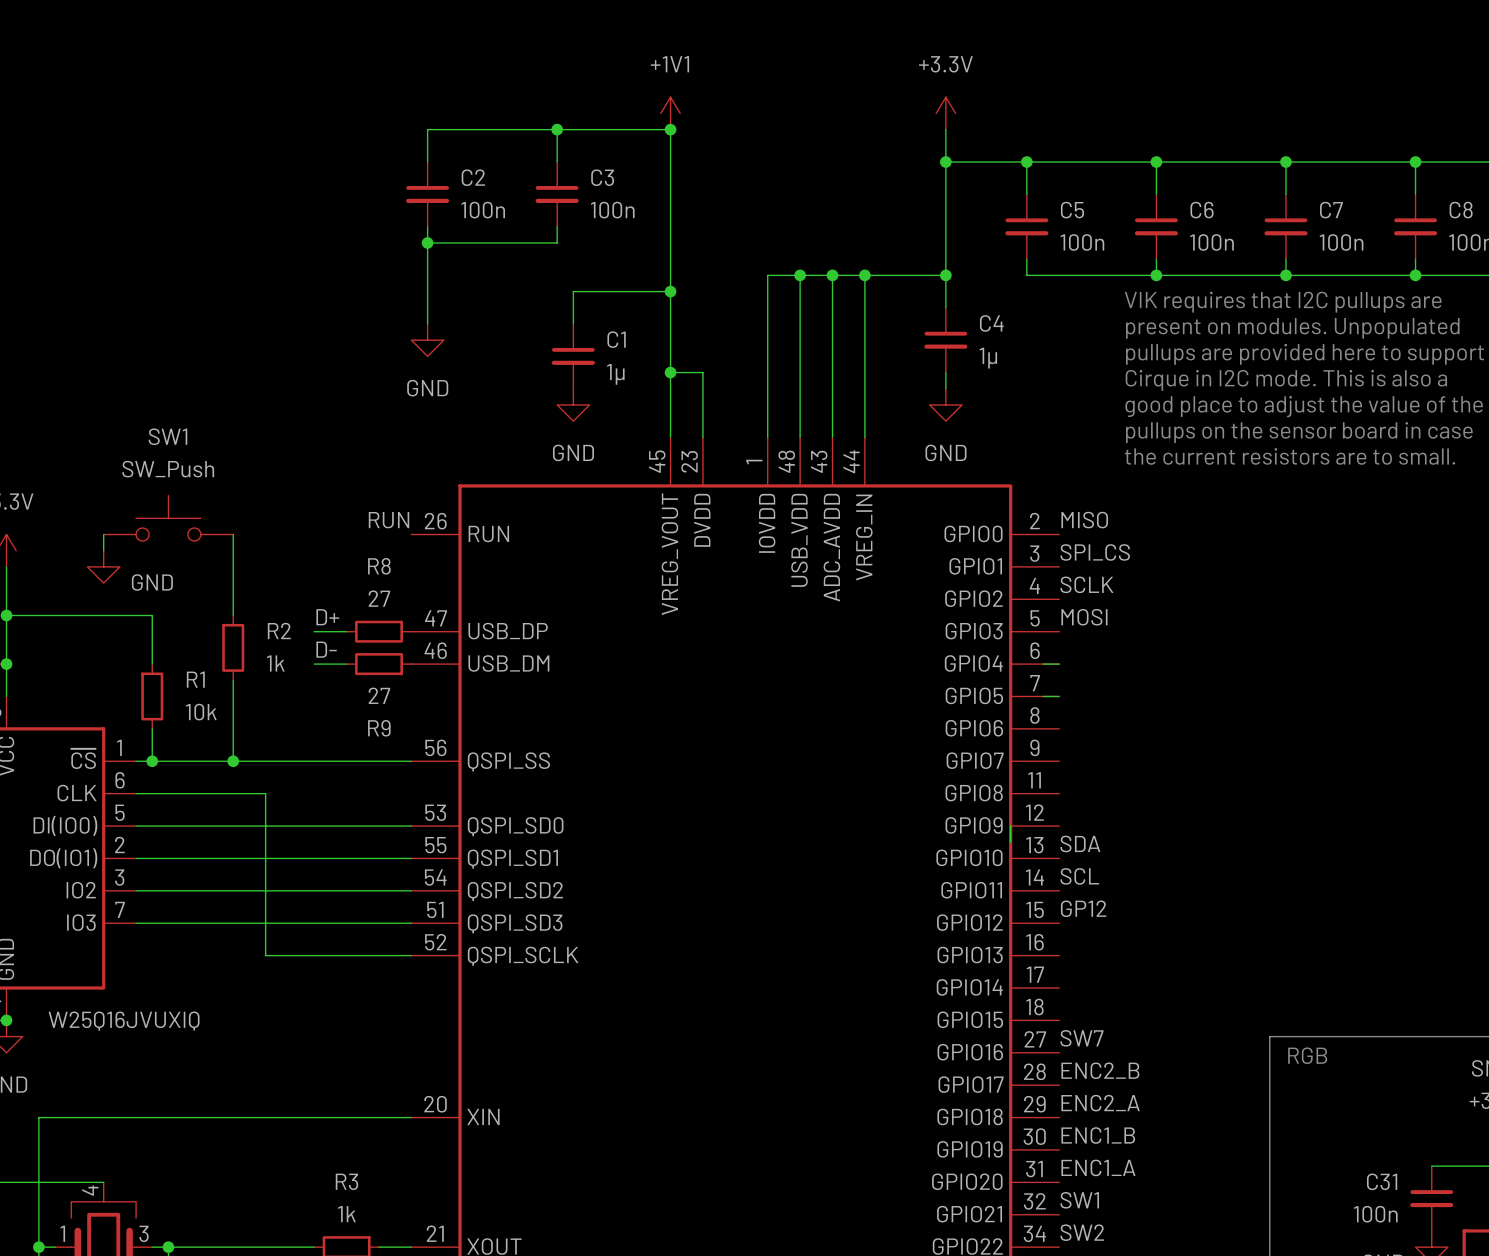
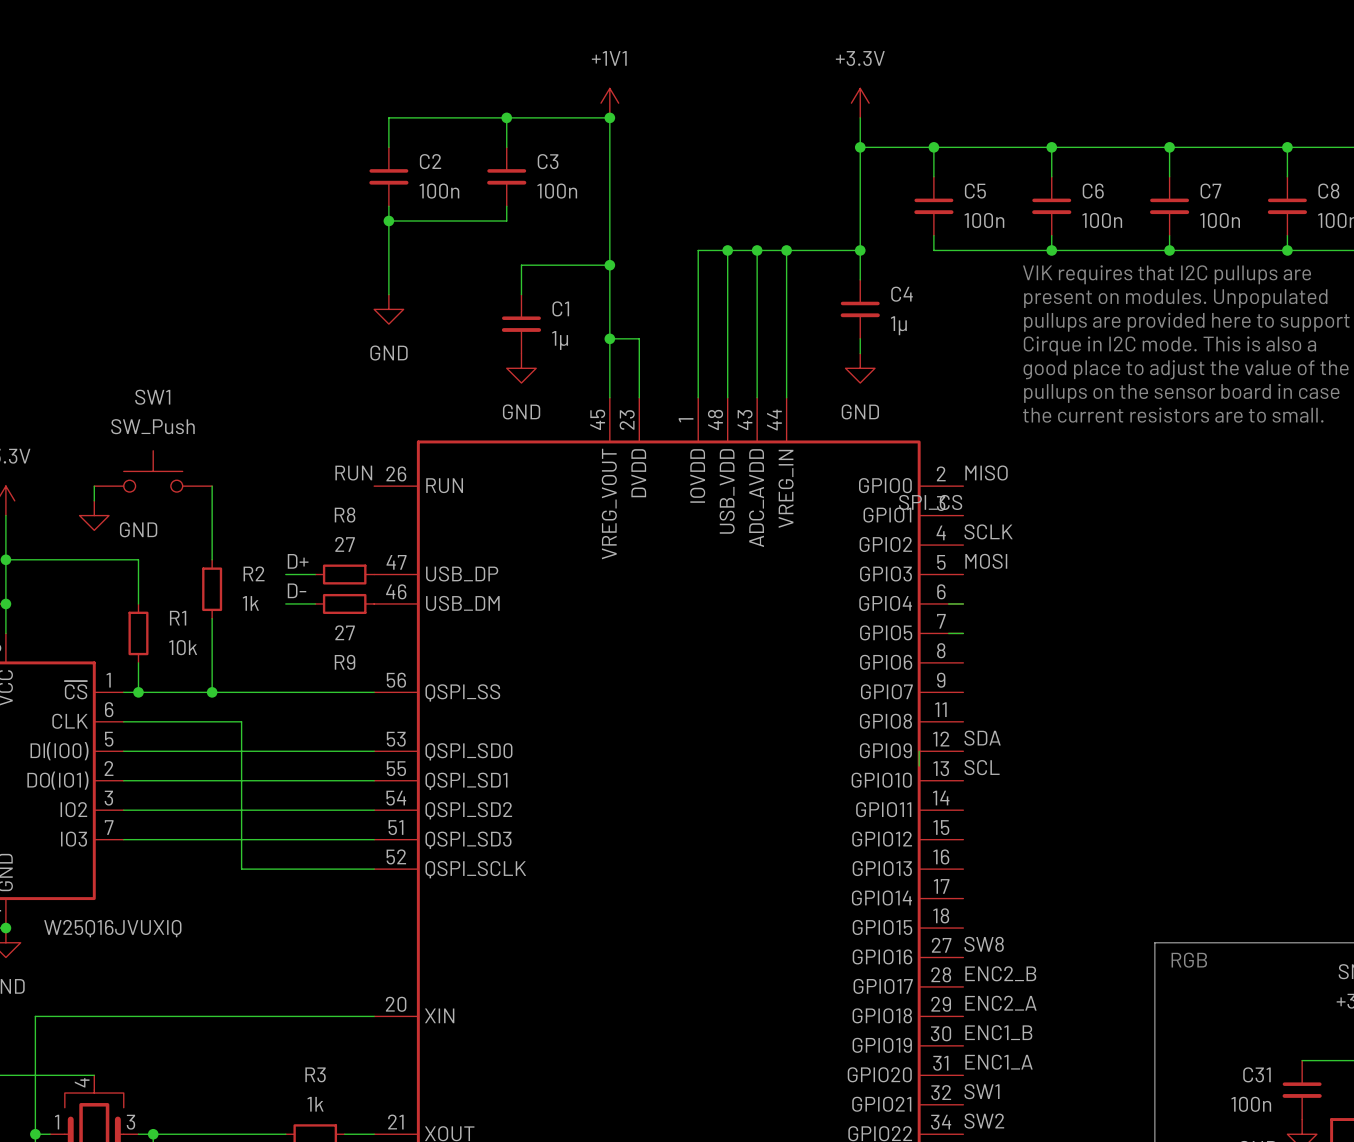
label position: SPI_CS (1095, 552) -> SPI_CS (930, 502)
label: none -> SDA (982, 738)
label: SDA (1080, 843) -> SCL (982, 767)
label: SCL (1079, 876) -> none
label: GP12 (1083, 908) -> none
label: SW7 (1081, 1038) -> SW8 (984, 944)

